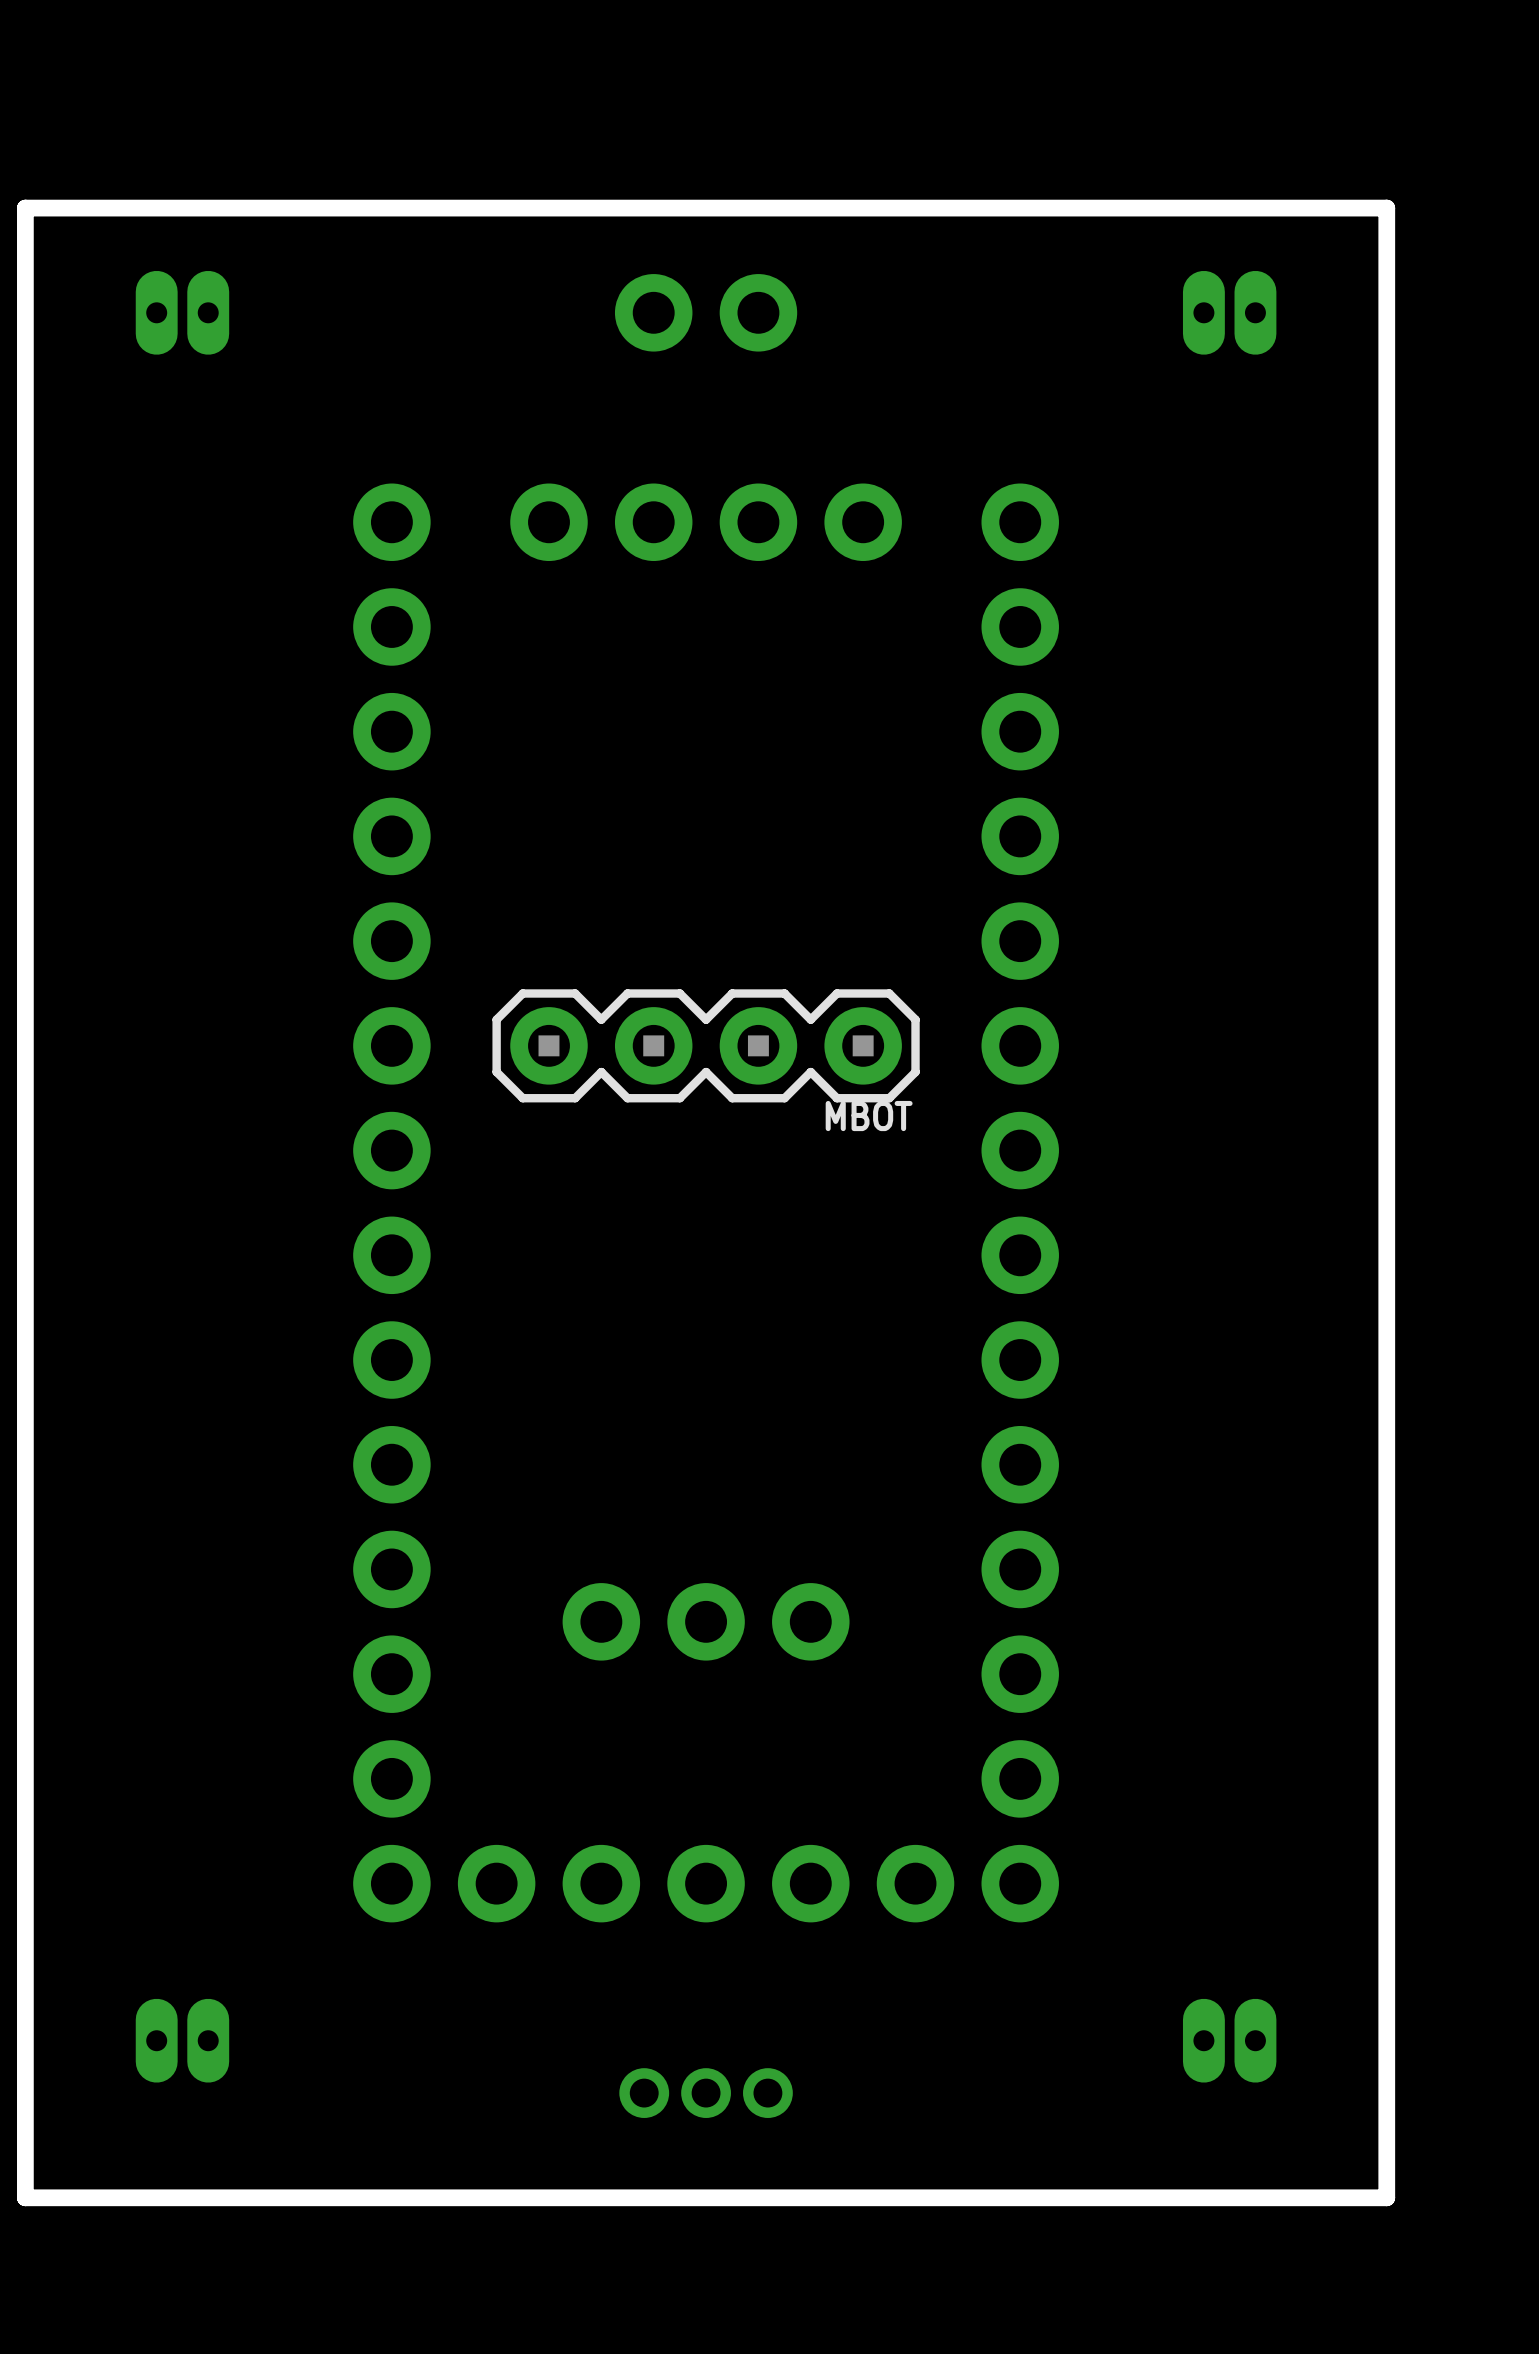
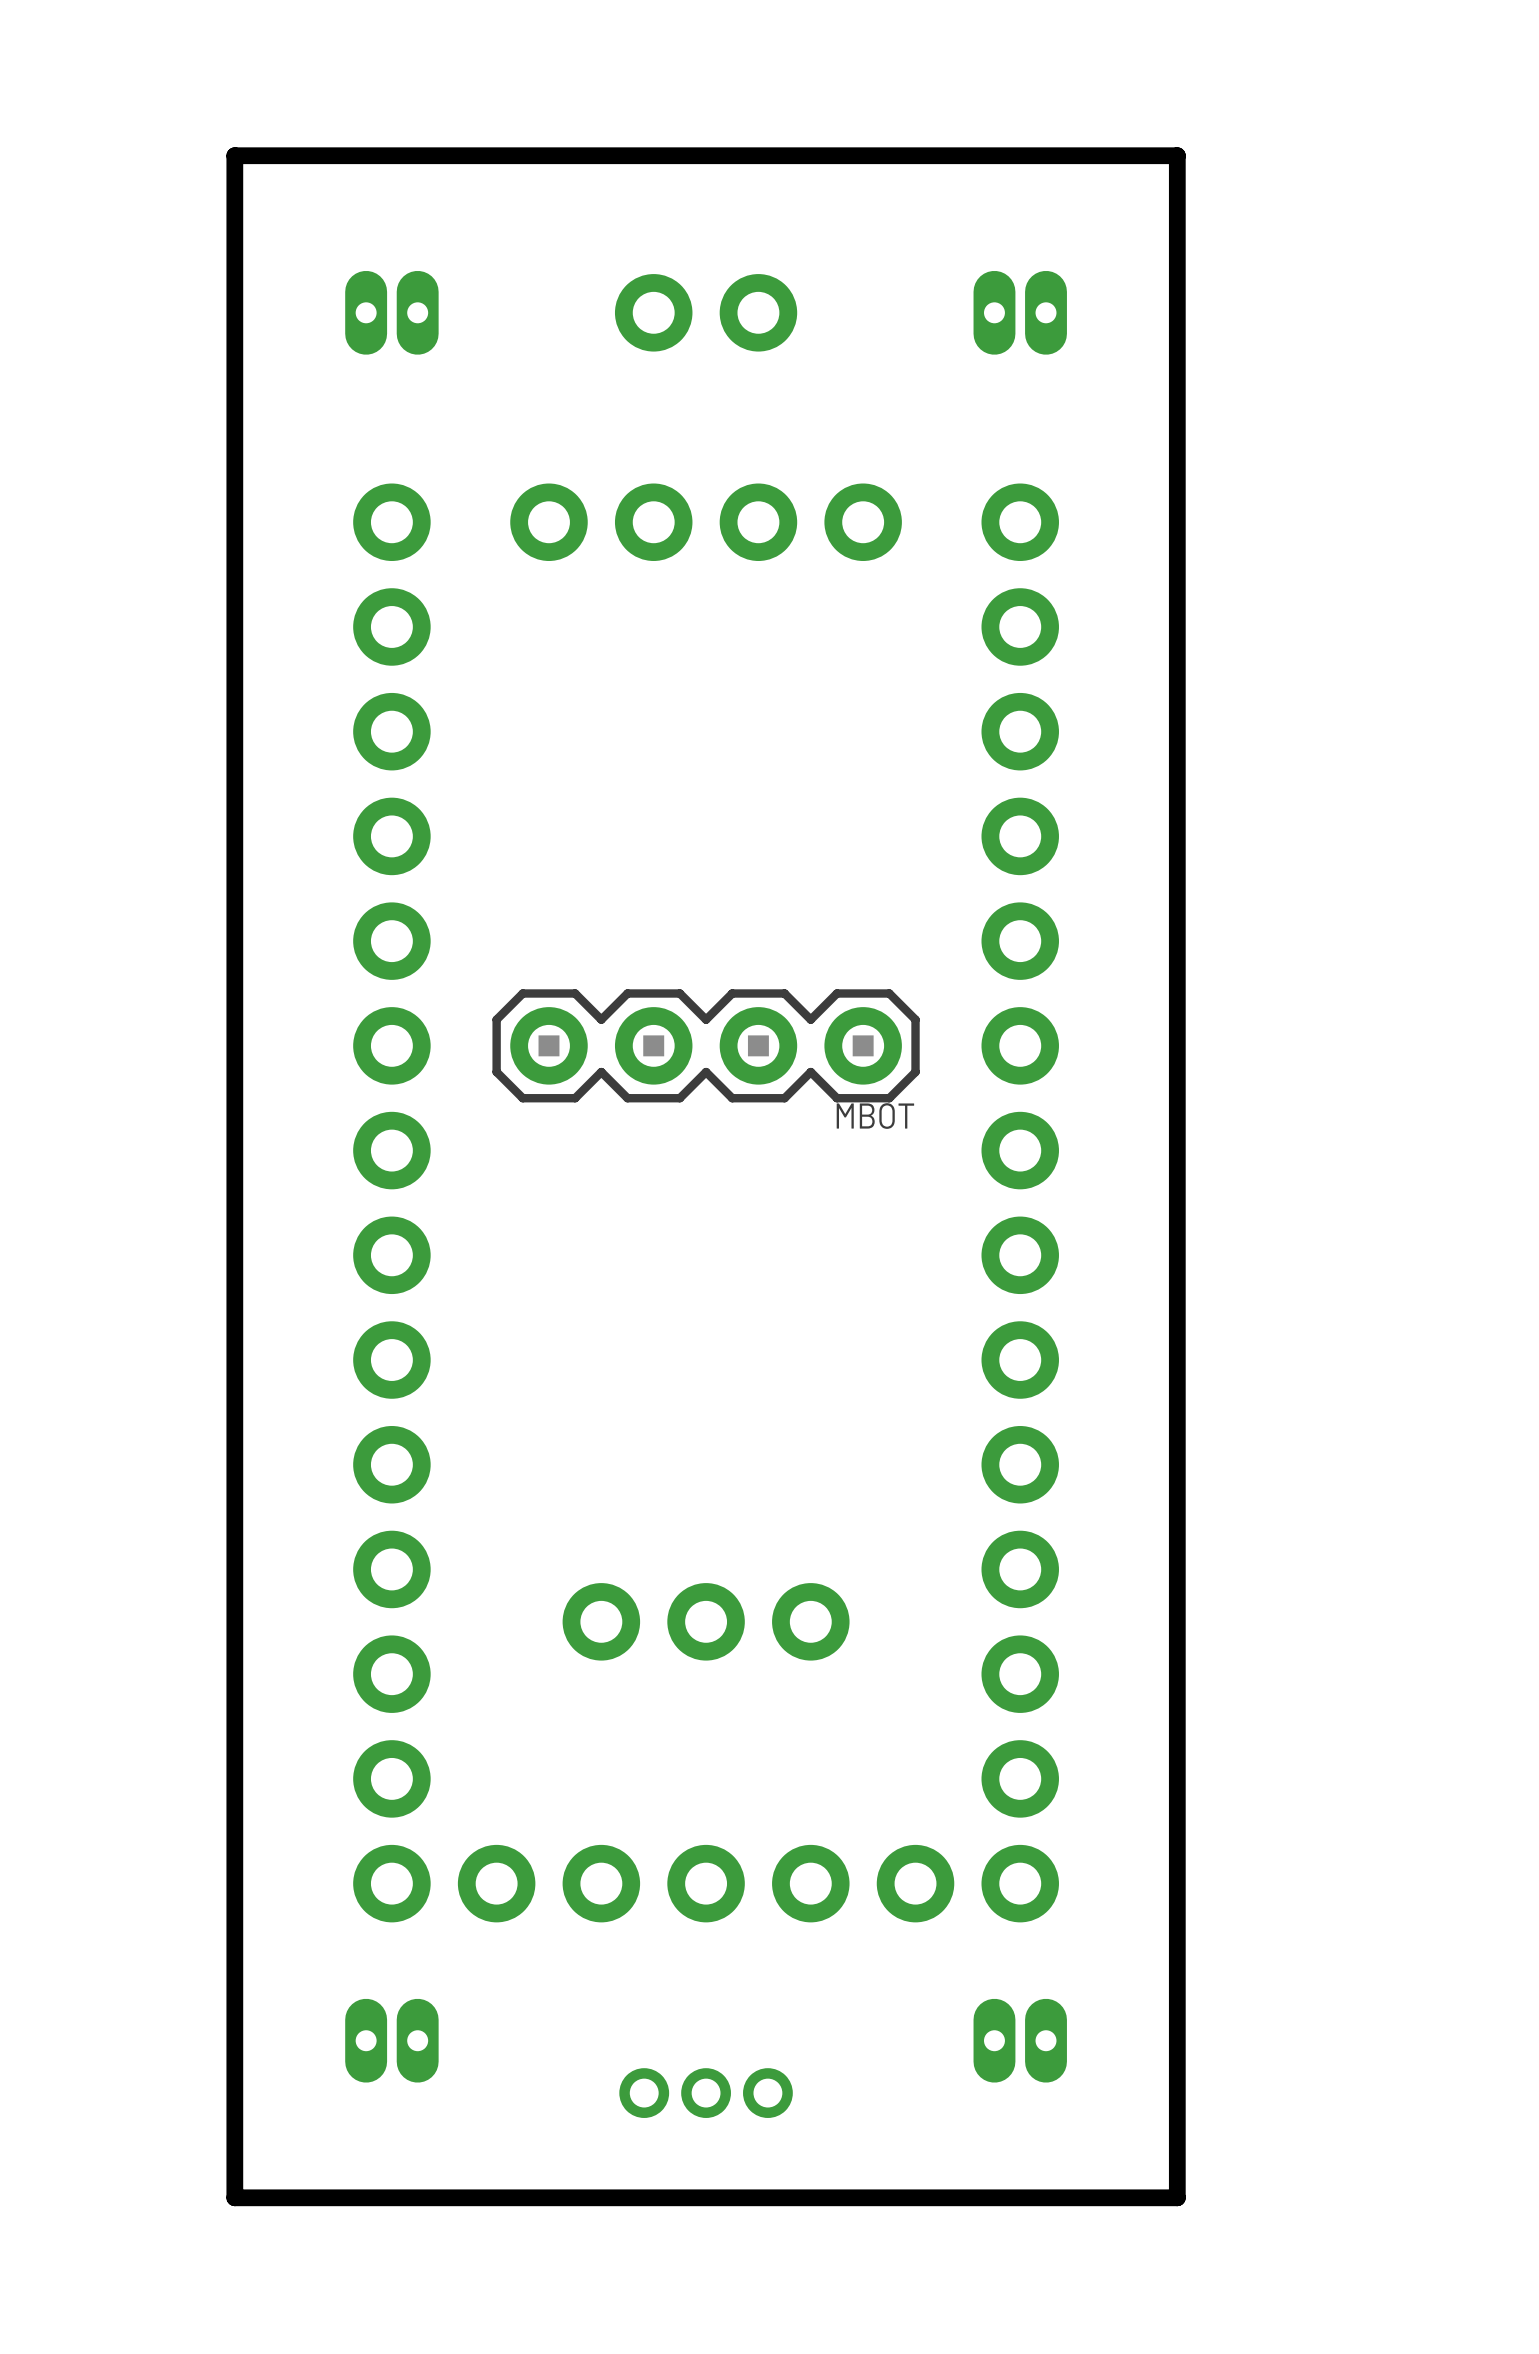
part position: (182, 312) -> (391, 312)
part position: (1229, 312) -> (1020, 312)
part position: (182, 2040) -> (391, 2040)
part position: (1229, 2040) -> (1020, 2040)
board edge: (1177, 2197) (1386, 2197) (1386, 208) (25, 208) (25, 2197) (234, 2197) -> (1177, 2197) (1177, 155) (234, 155) (234, 2197)

